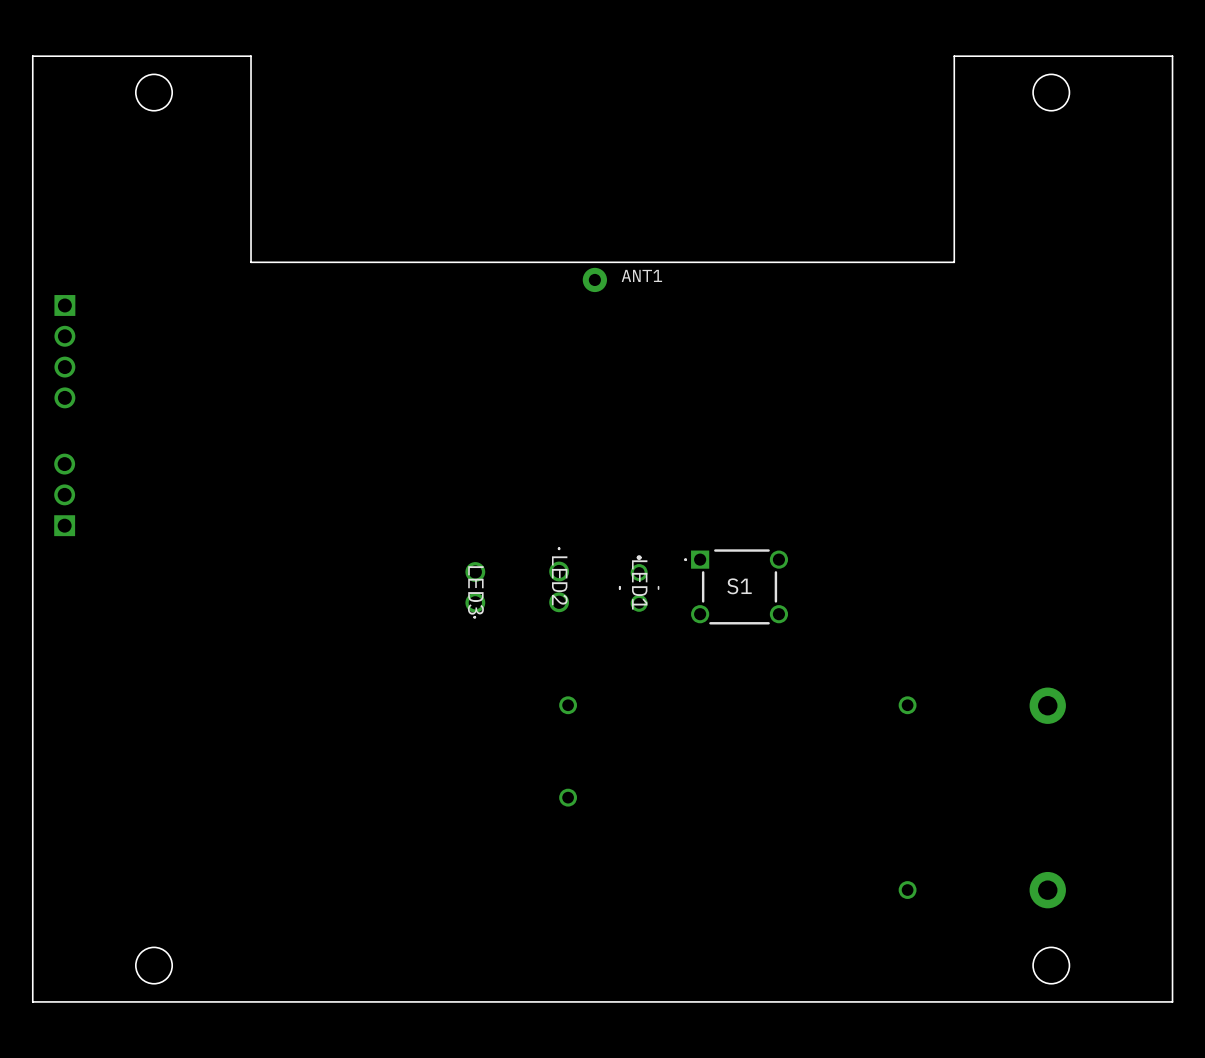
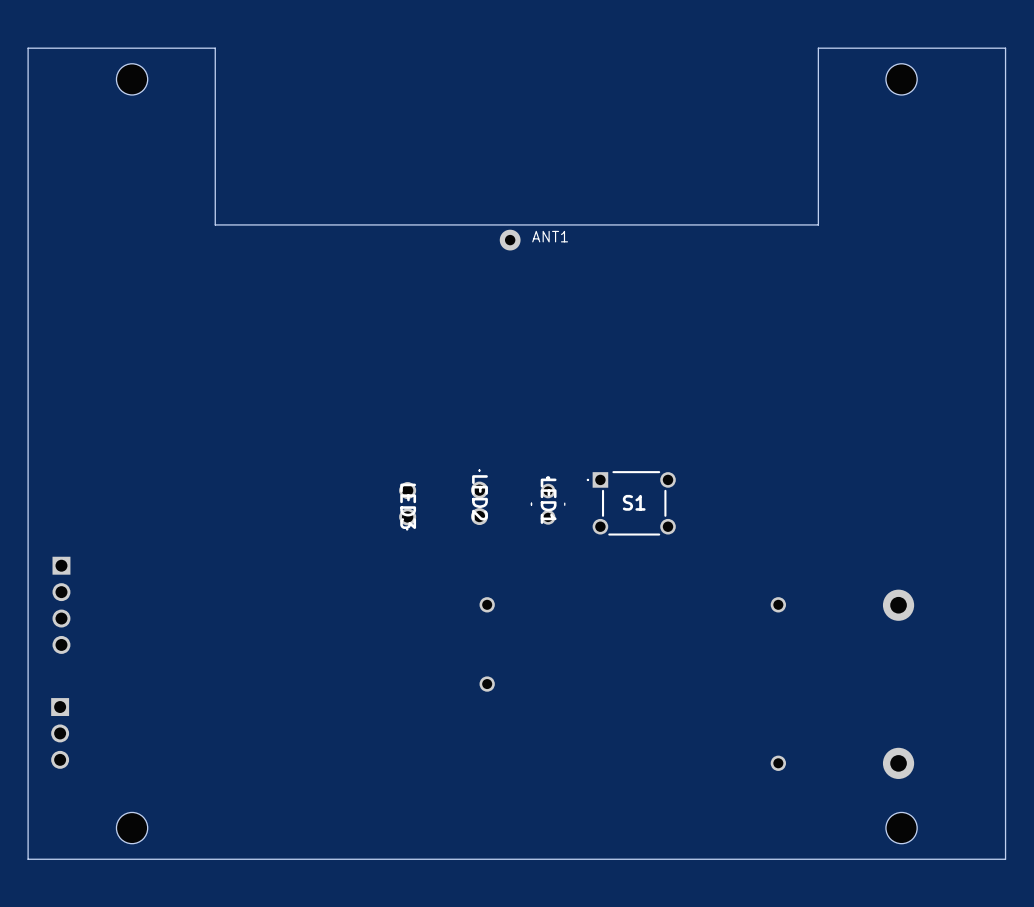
part: (64, 351) -> none
part: (64, 494) -> none
part: none -> (61, 605)
part: none -> (60, 733)

